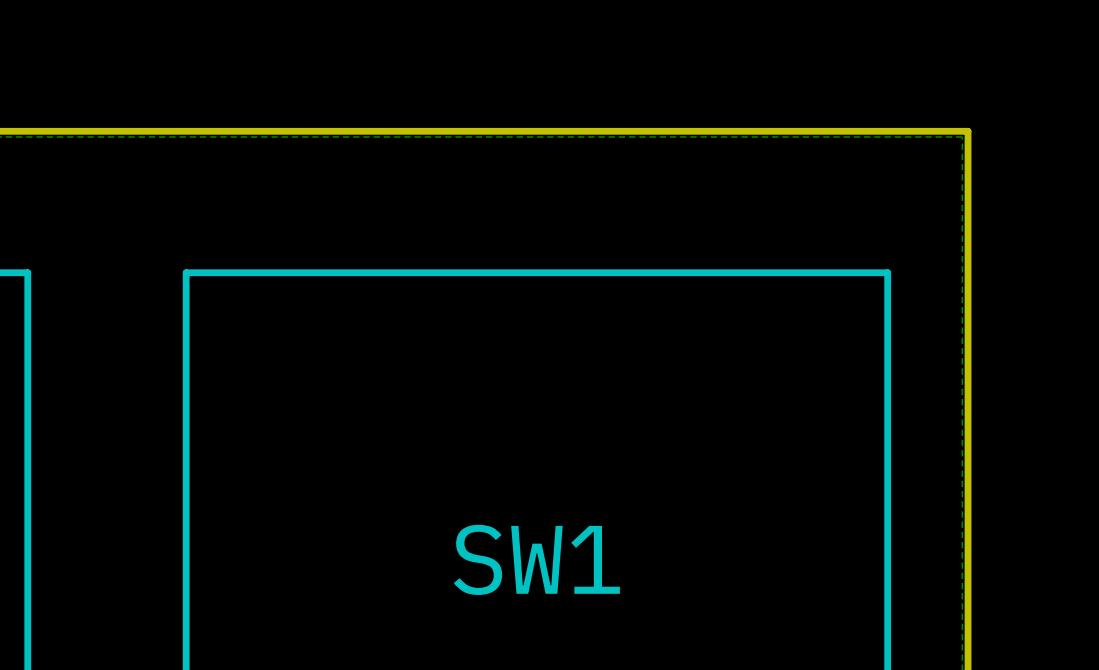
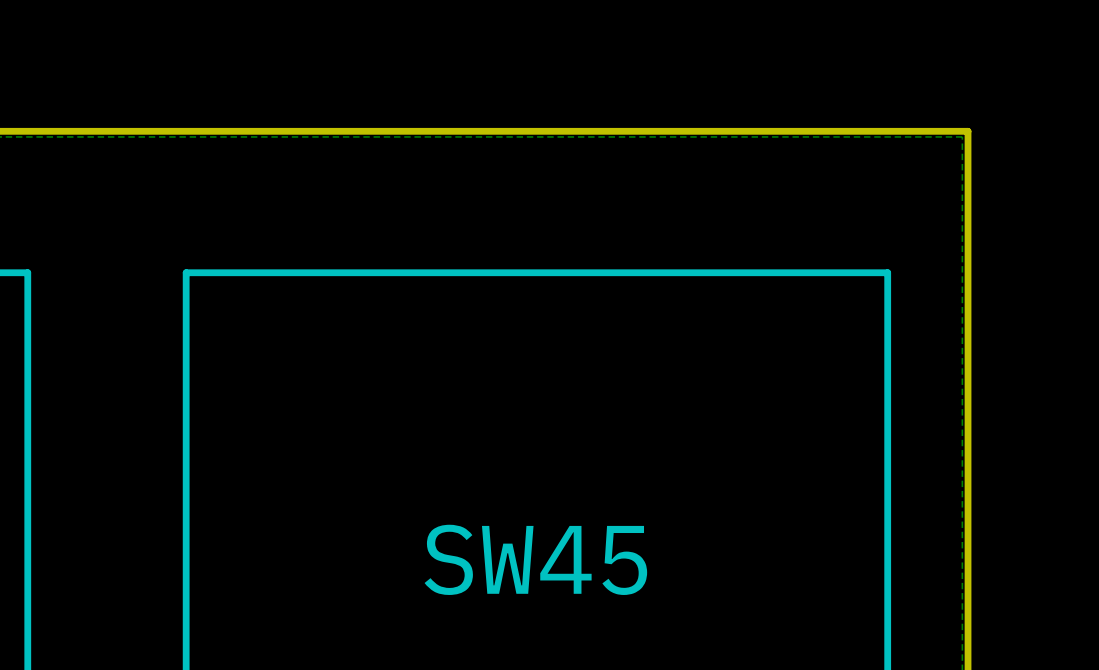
SW1 name: SW1 (536, 559) -> SW45 (535, 559)

